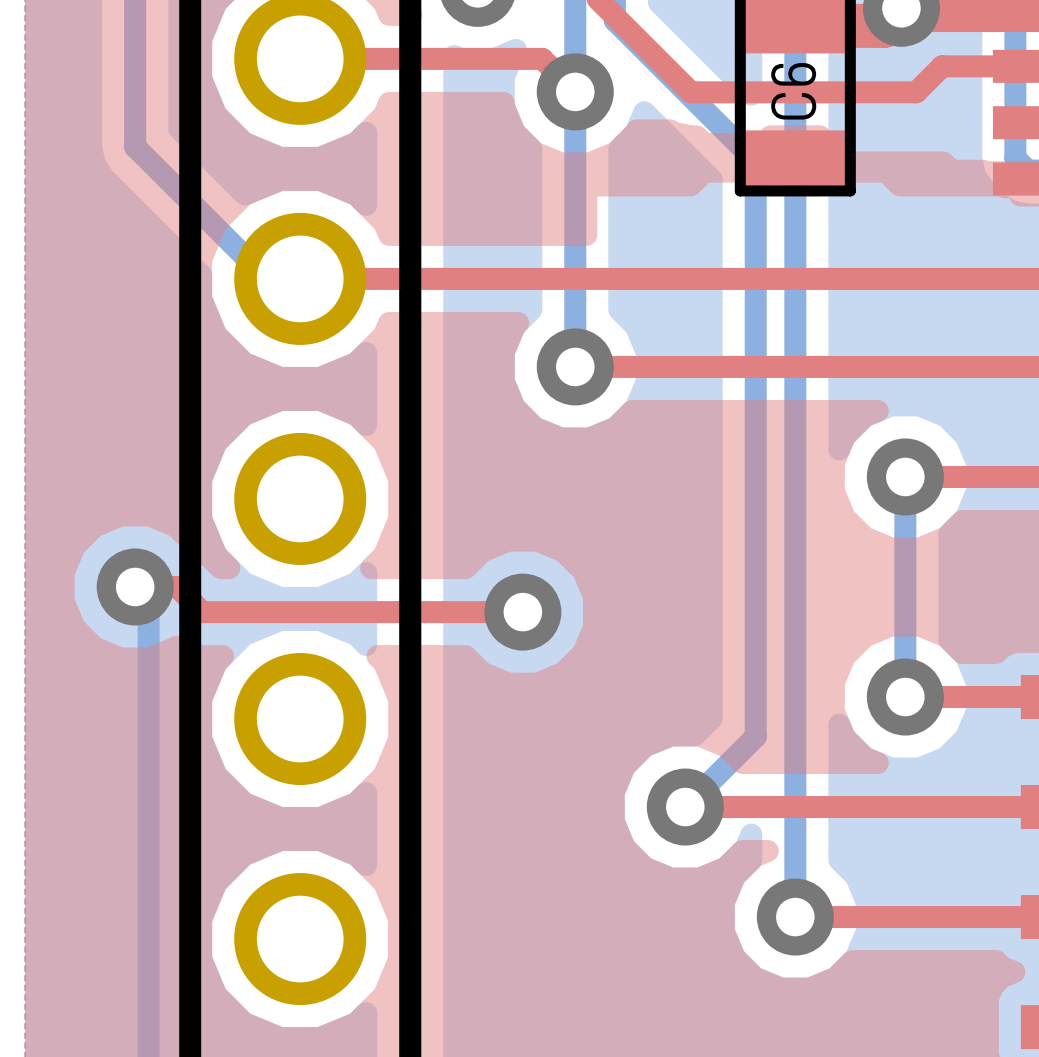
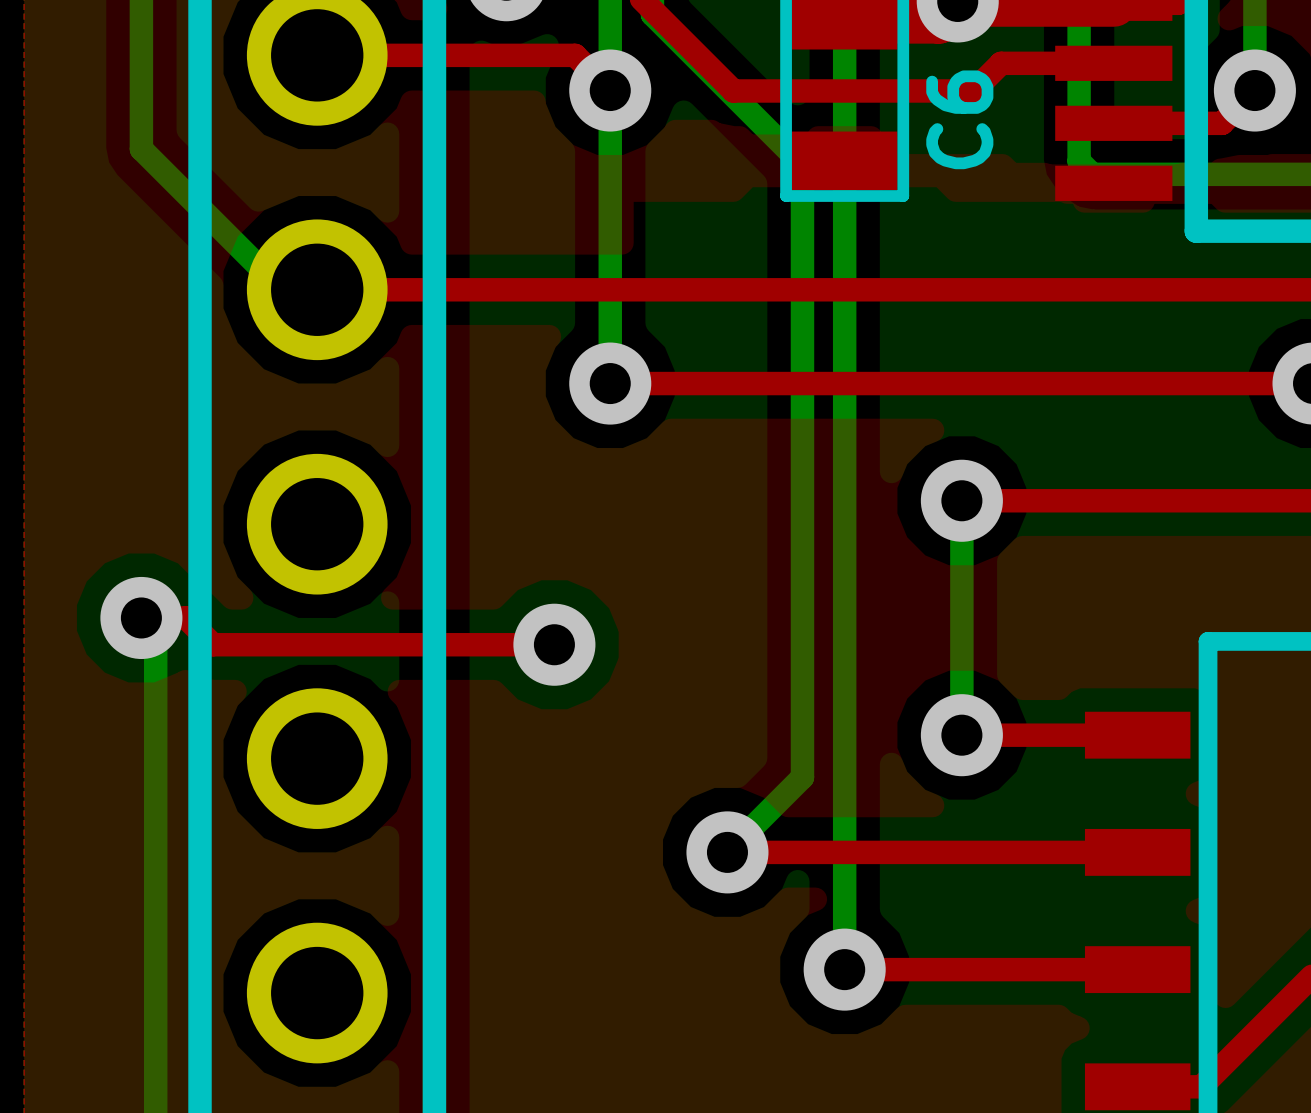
C6 name position: C6 (793, 91) -> C6 (959, 119)

